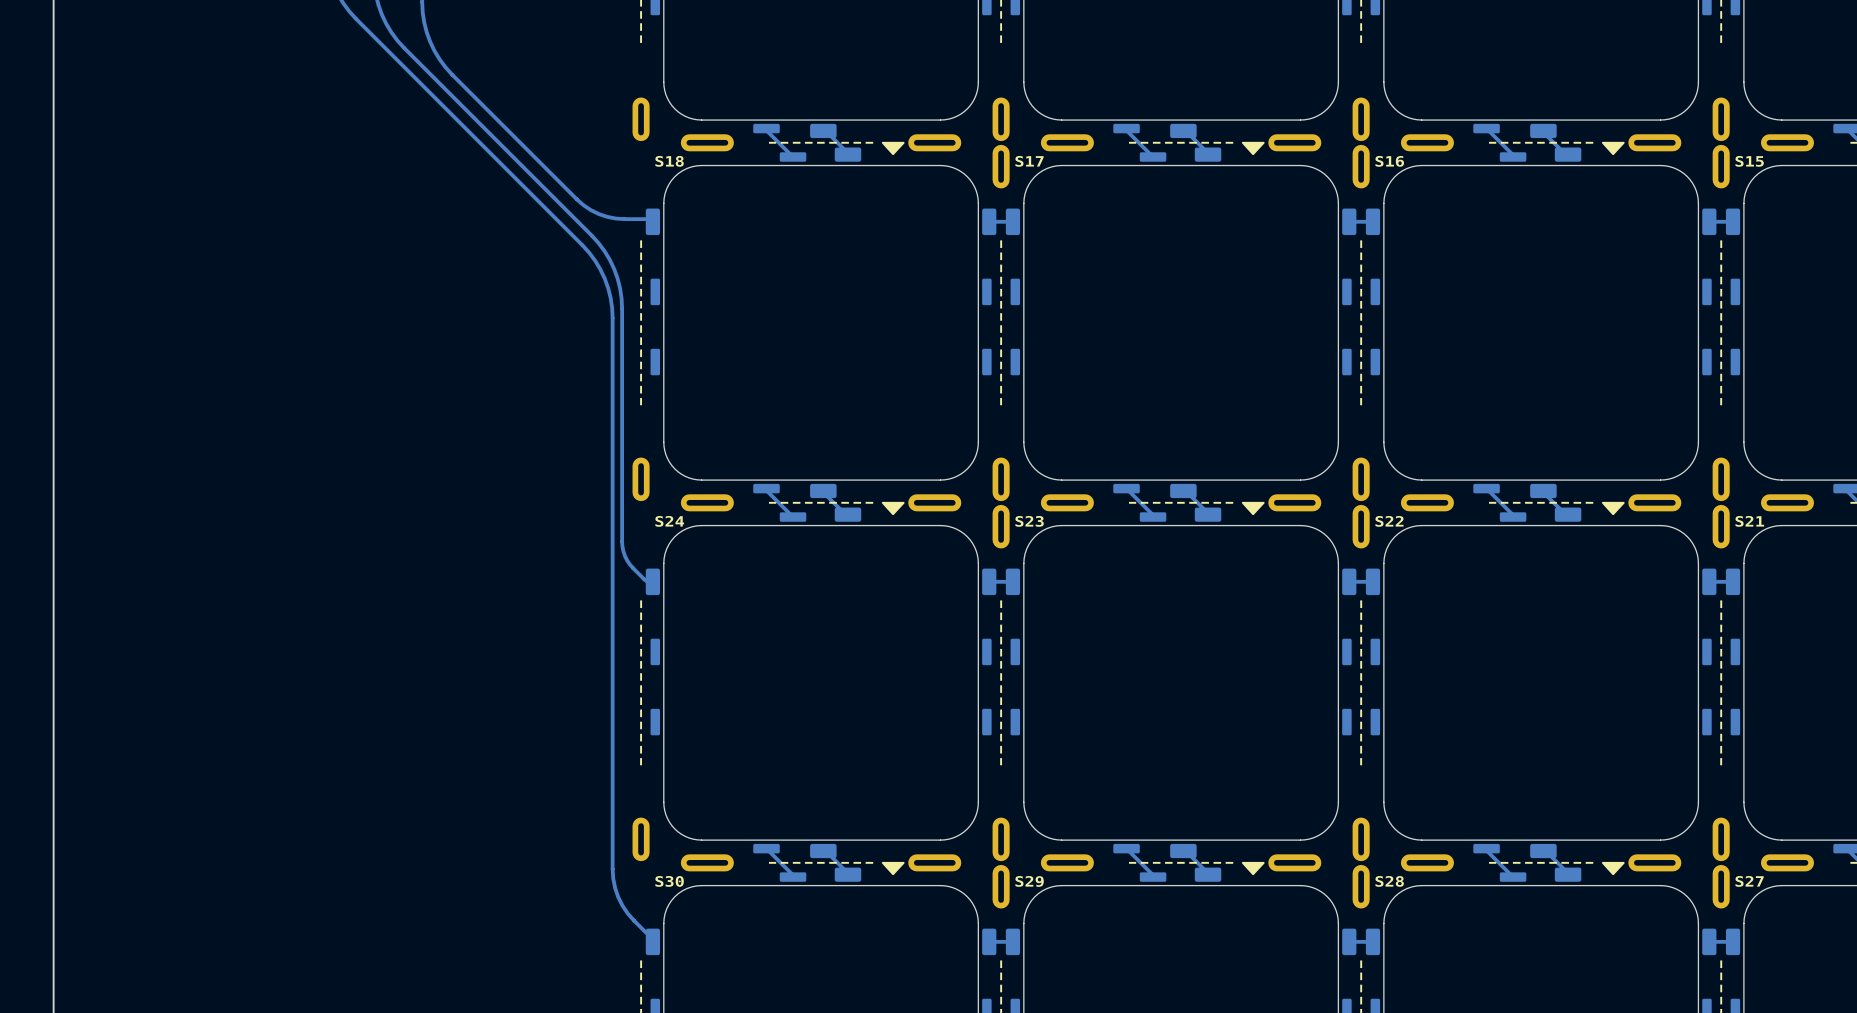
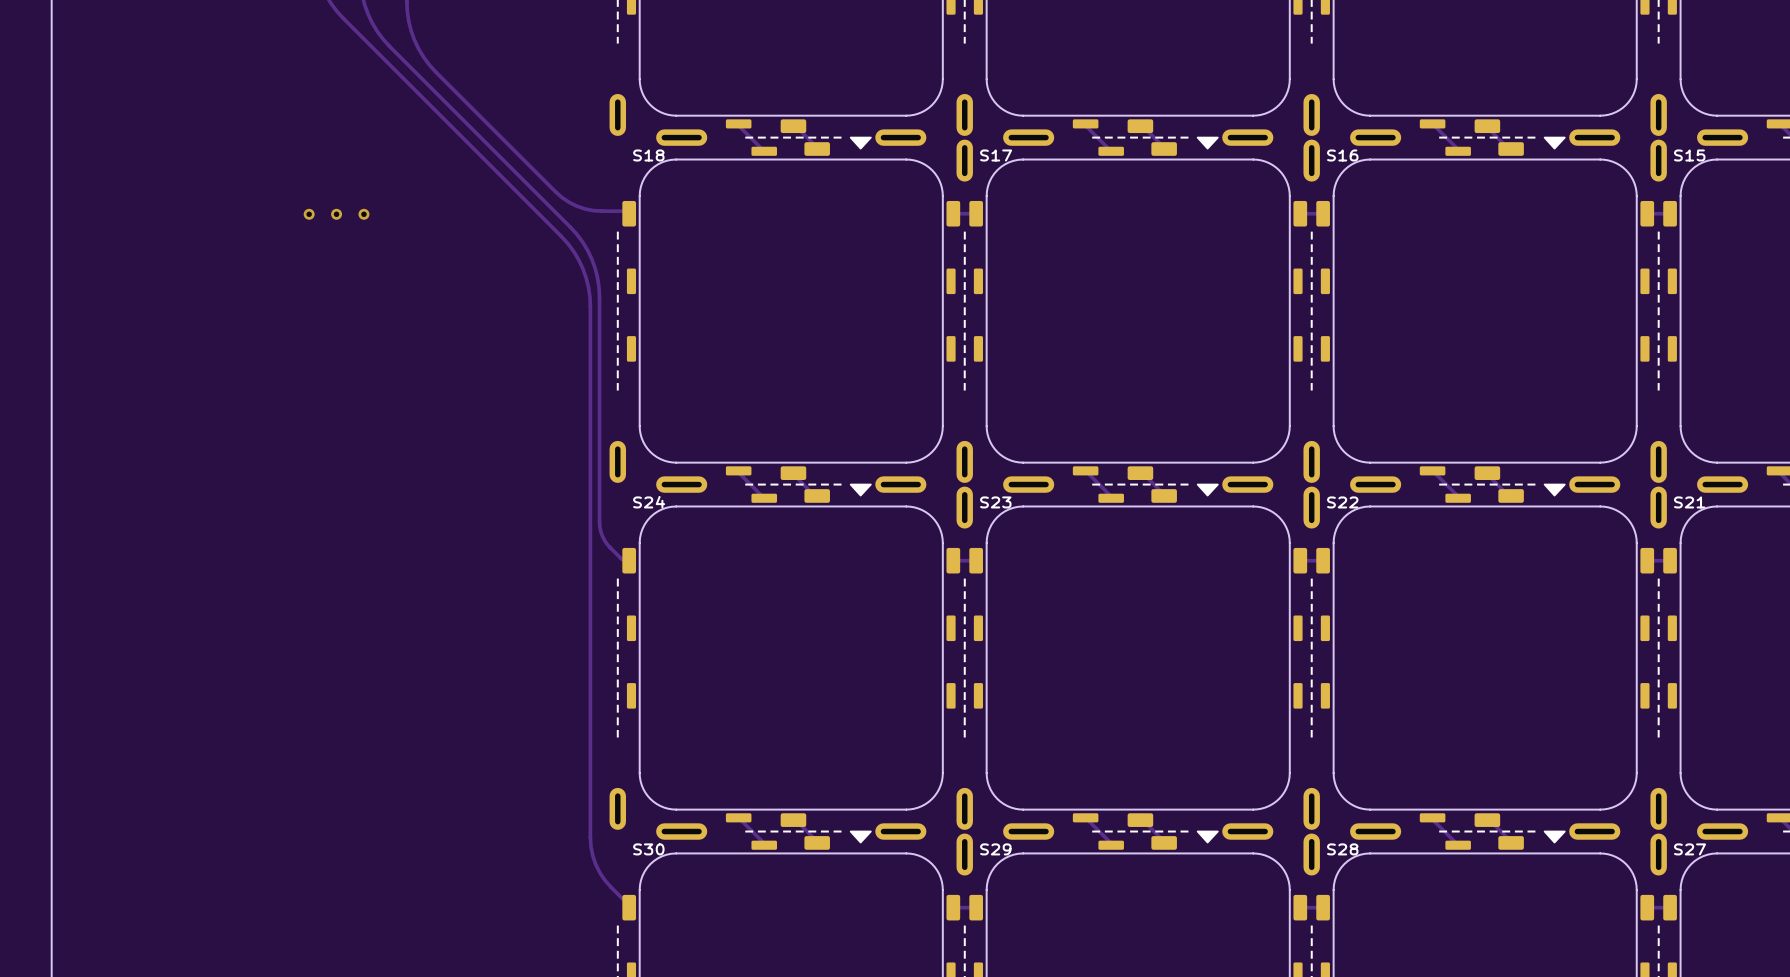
via: none -> (309, 214)
via: none -> (336, 214)
via: none -> (363, 214)

